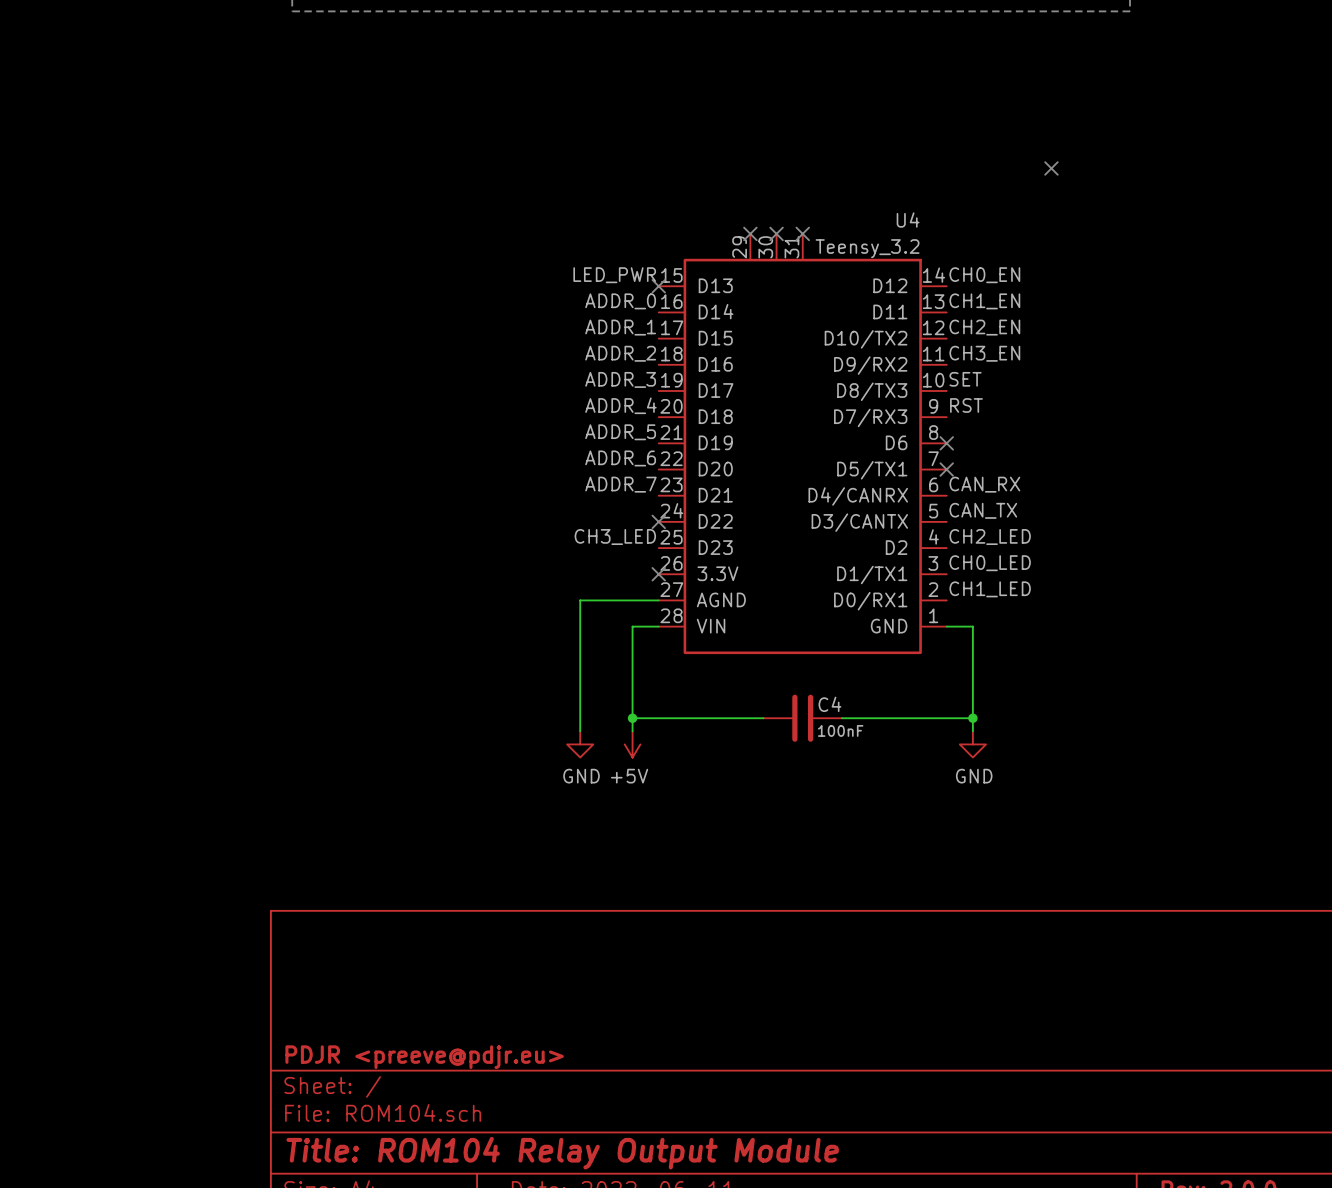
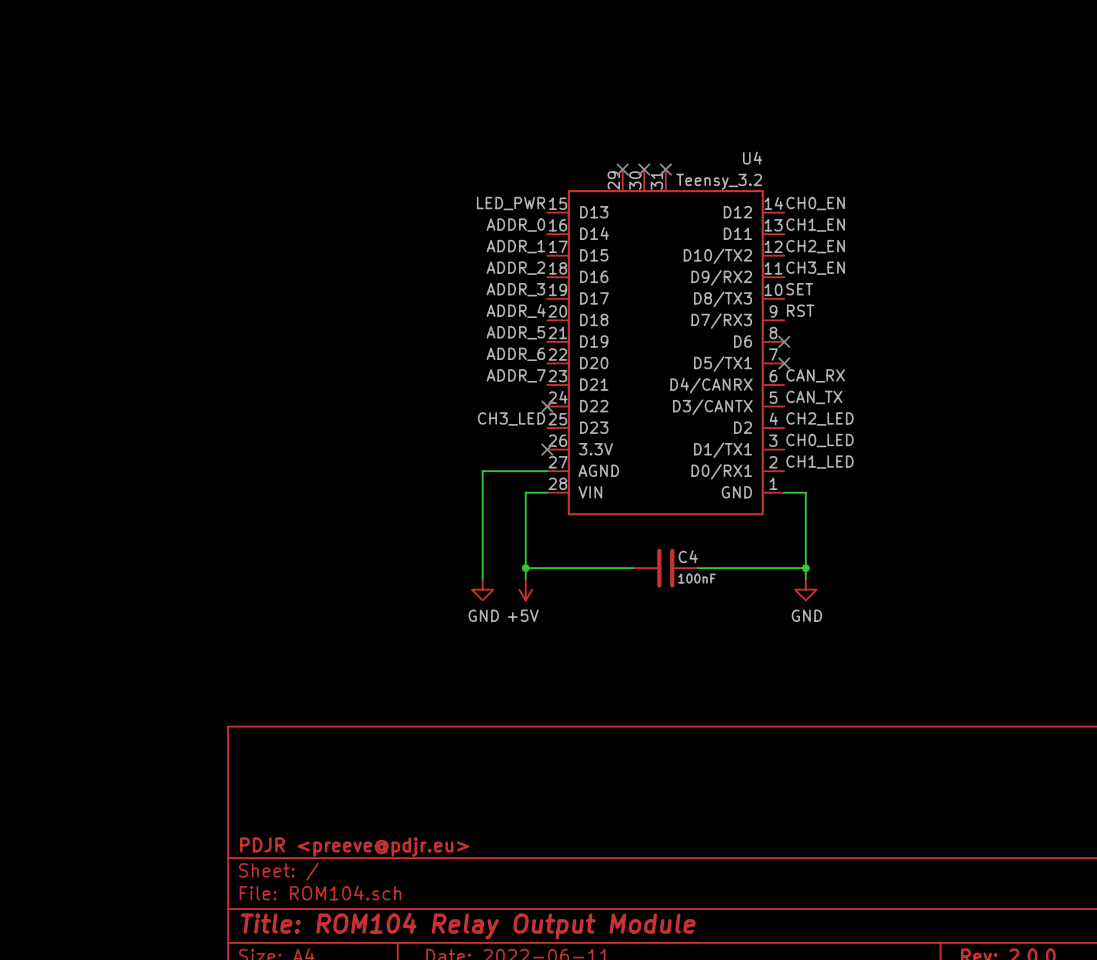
no-connect mark: (1051, 168) -> none
no-connect mark: (658, 286) -> none

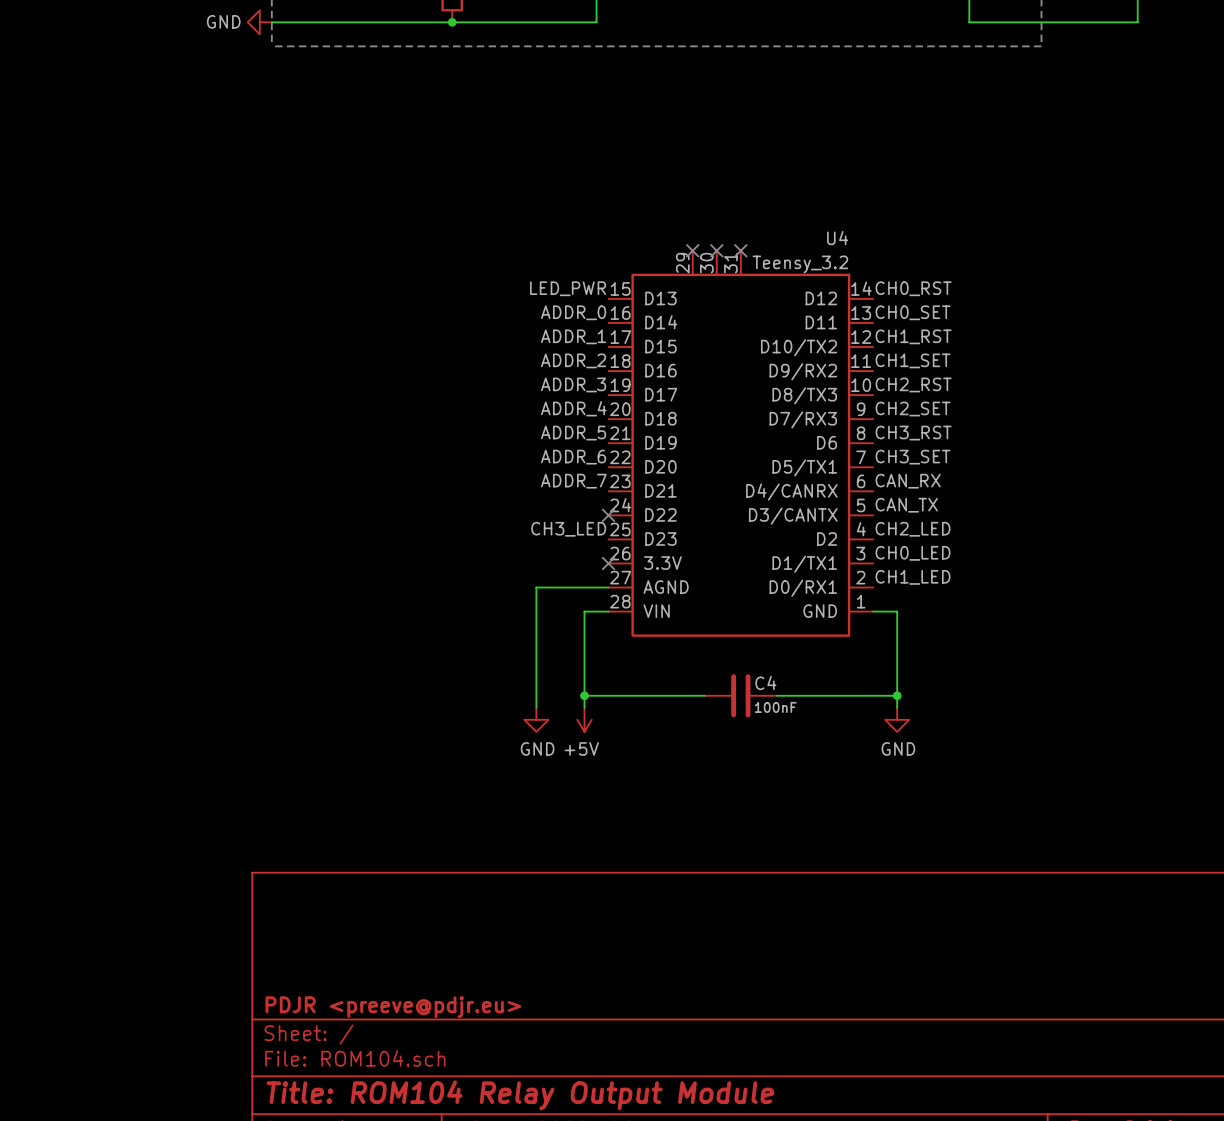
label: CH0_EN (815, 203) -> CH0_RST (913, 288)
label: CH1_EN (815, 225) -> CH0_SET (913, 312)
label: CH2_EN (815, 246) -> CH1_RST (913, 336)
label: CH3_EN (815, 268) -> CH1_SET (913, 360)
label: SET (799, 289) -> CH2_RST (913, 384)
label: RST (800, 310) -> CH2_SET (913, 409)
label: none -> CH3_RST (913, 433)
no-connect mark: (784, 341) -> none
label: none -> CH3_SET (913, 457)
no-connect mark: (784, 363) -> none

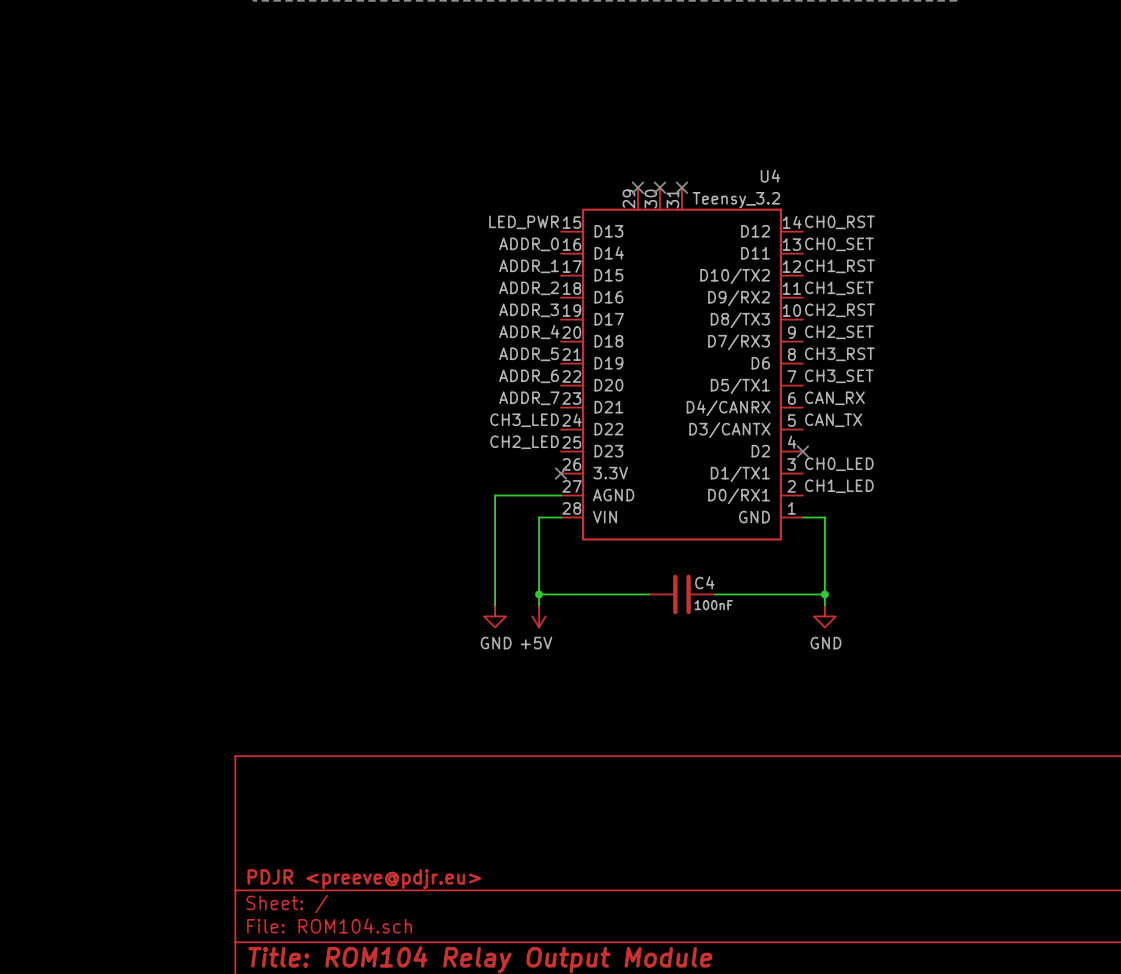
label: none -> CH3_LED (524, 420)
no-connect mark: (608, 515) -> none
label: CH3_LED (568, 529) -> CH2_LED (524, 442)
label: CH2_LED (913, 529) -> none
no-connect mark: none -> (802, 451)

